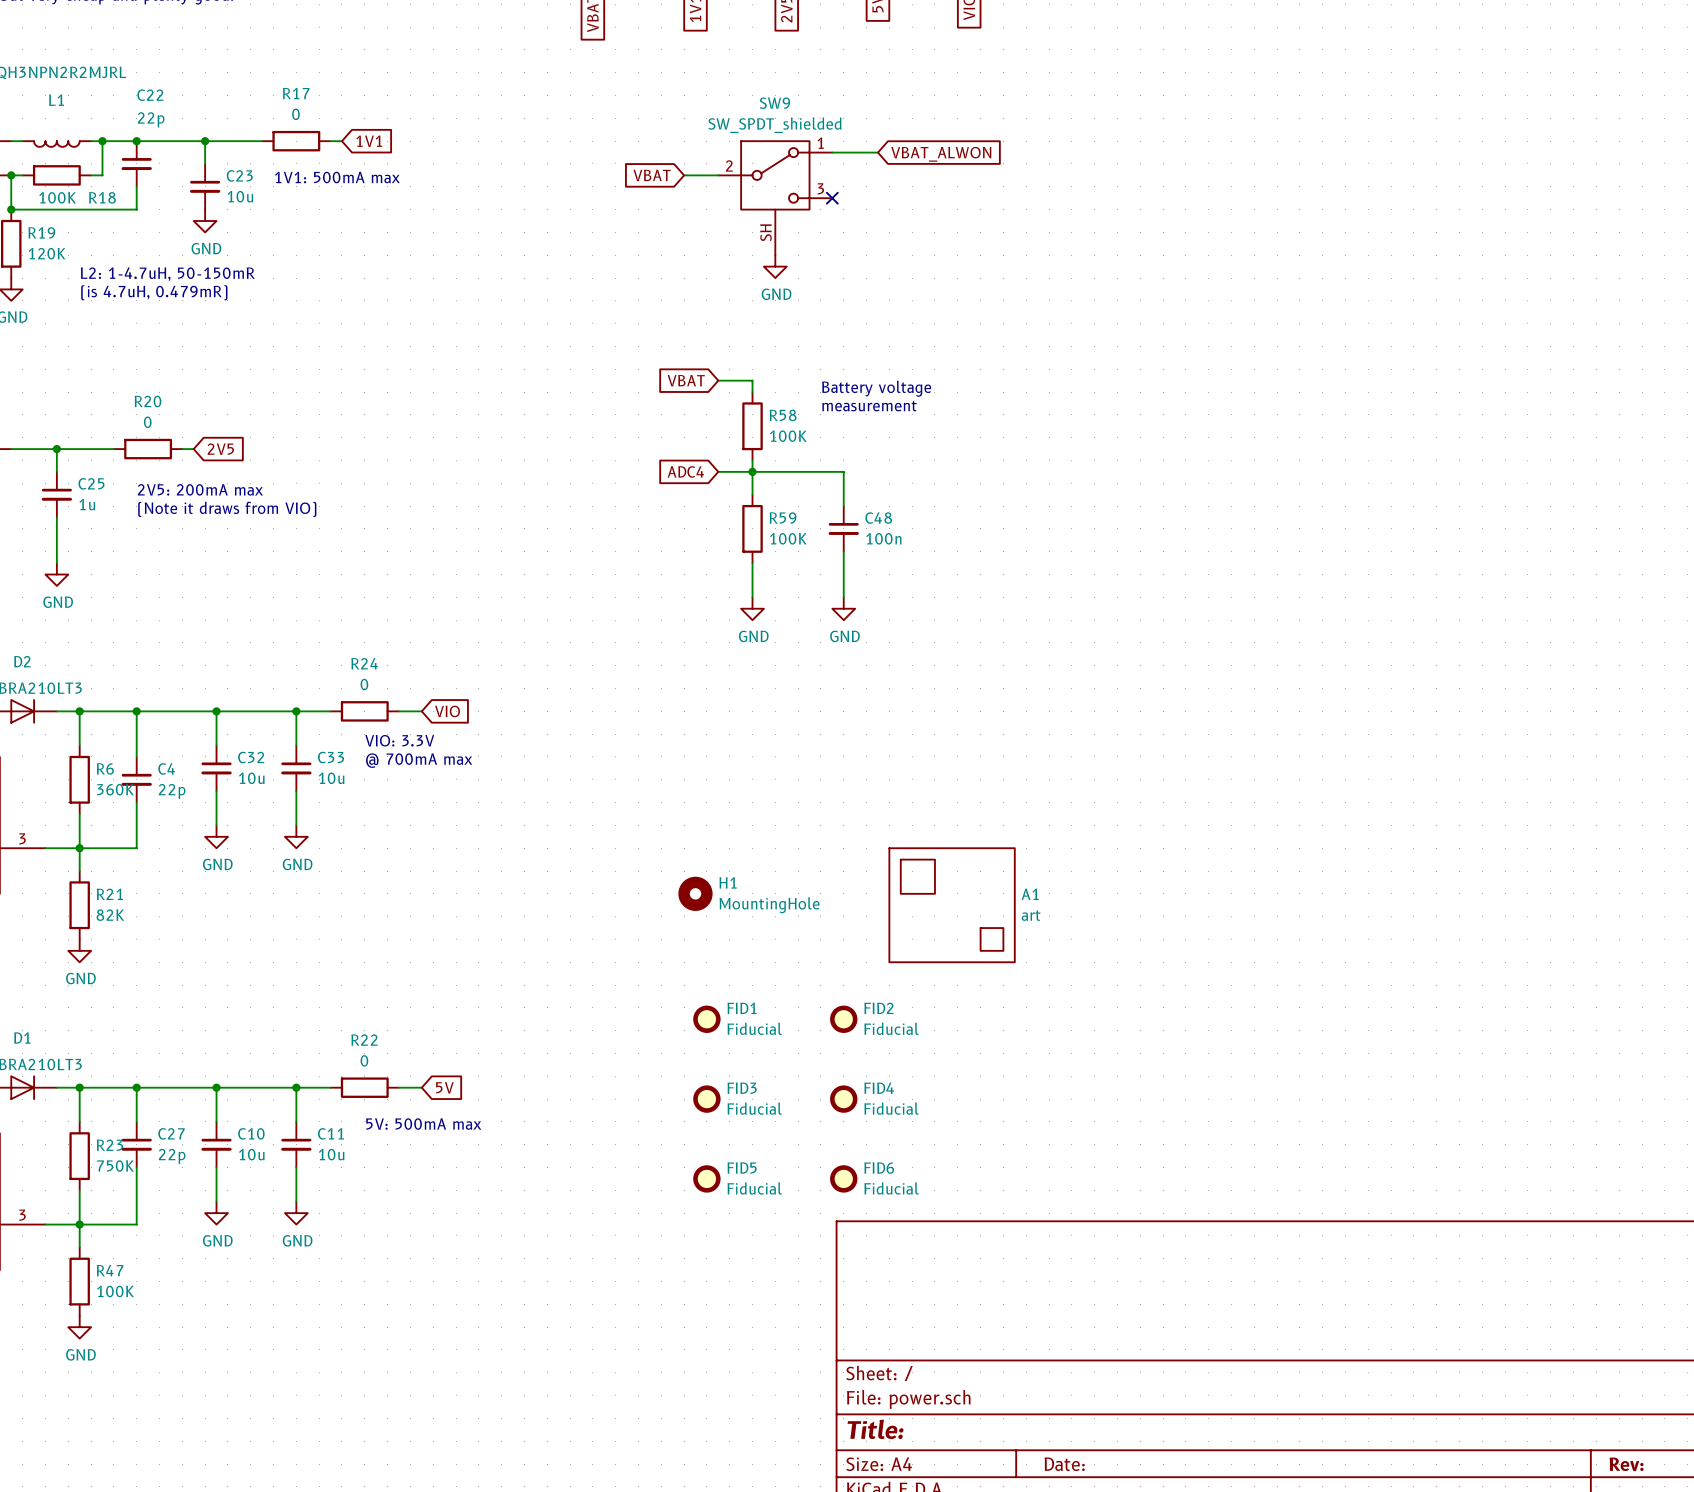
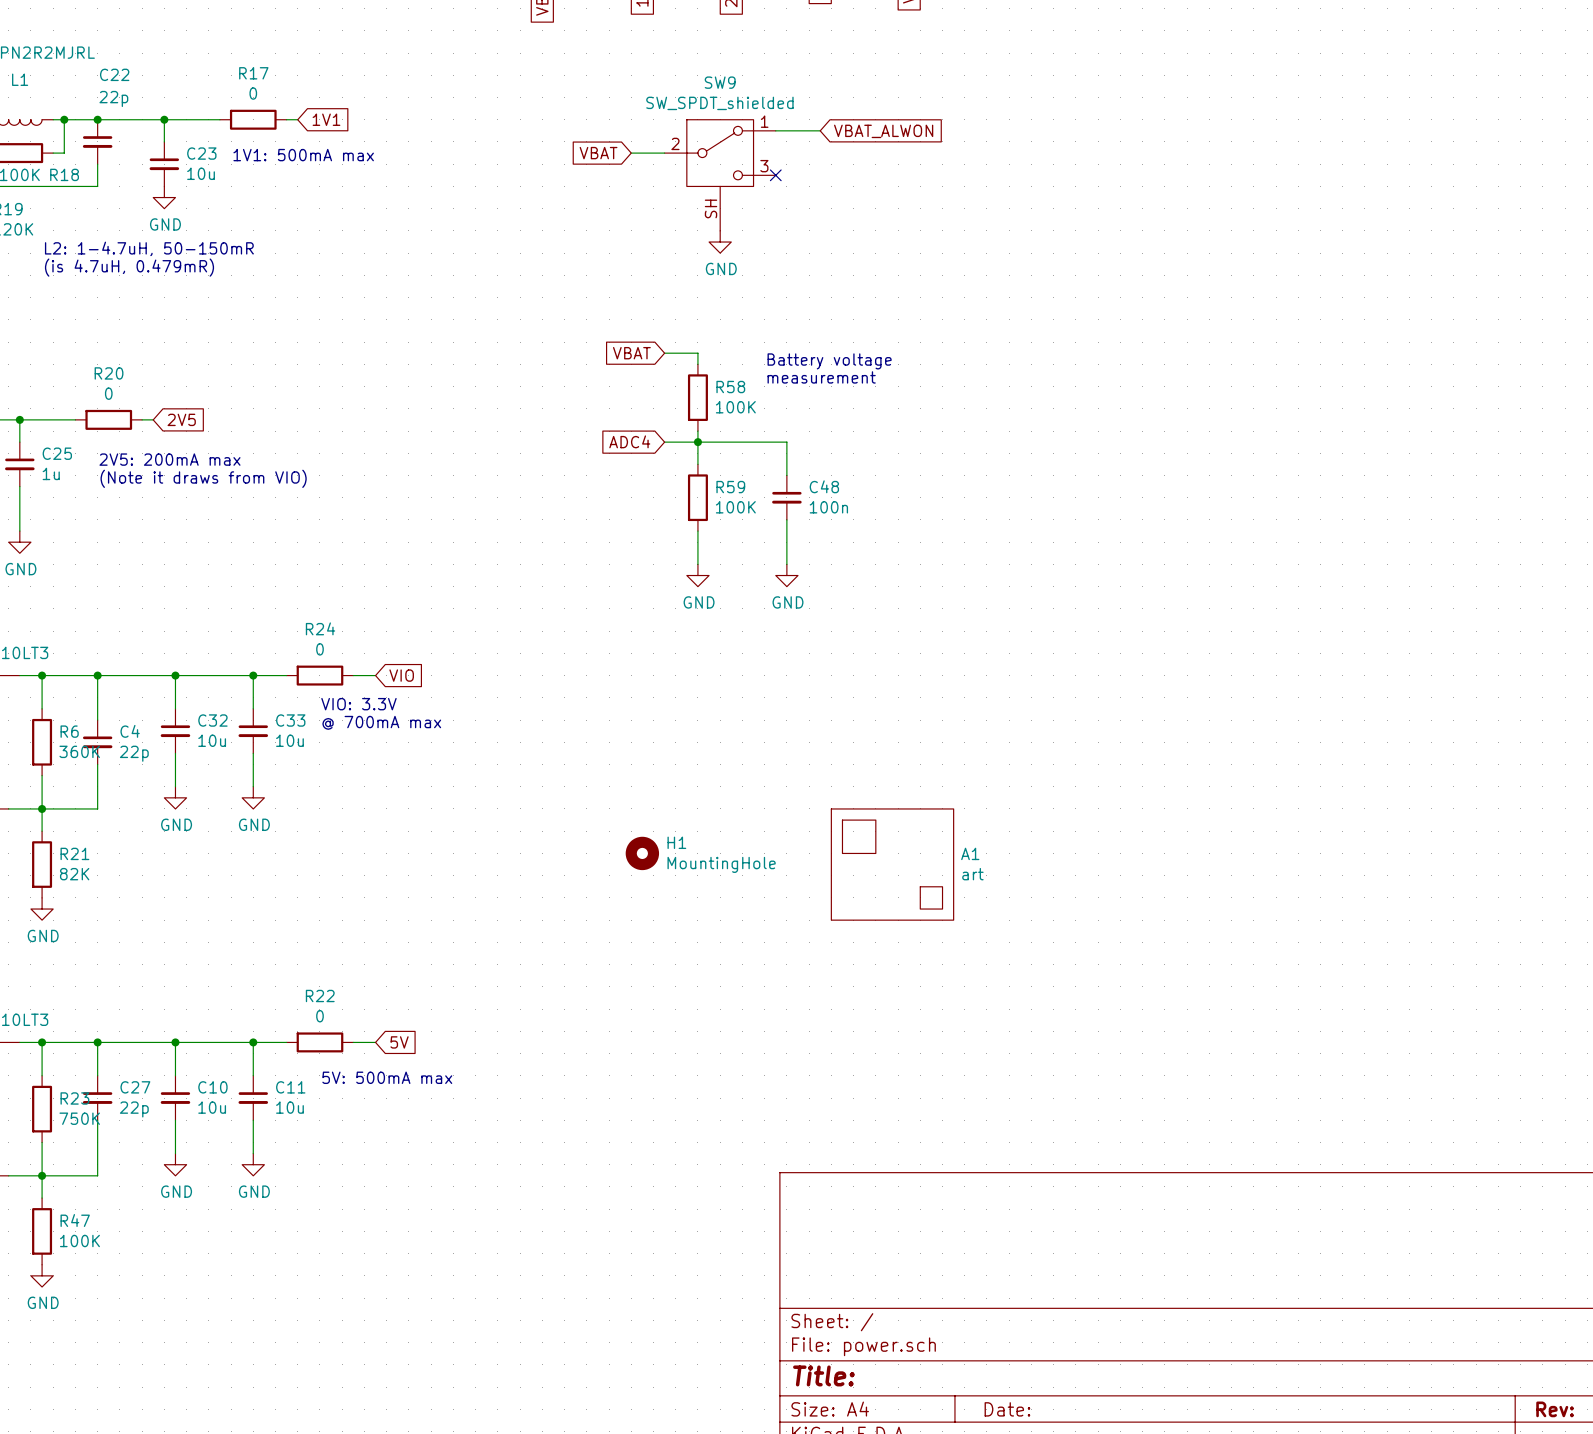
FID1: Fiducial (706, 1019) -> none
FID2: Fiducial (843, 1019) -> none
FID3: Fiducial (706, 1099) -> none
FID4: Fiducial (843, 1099) -> none
FID5: Fiducial (706, 1178) -> none
FID6: Fiducial (843, 1178) -> none

